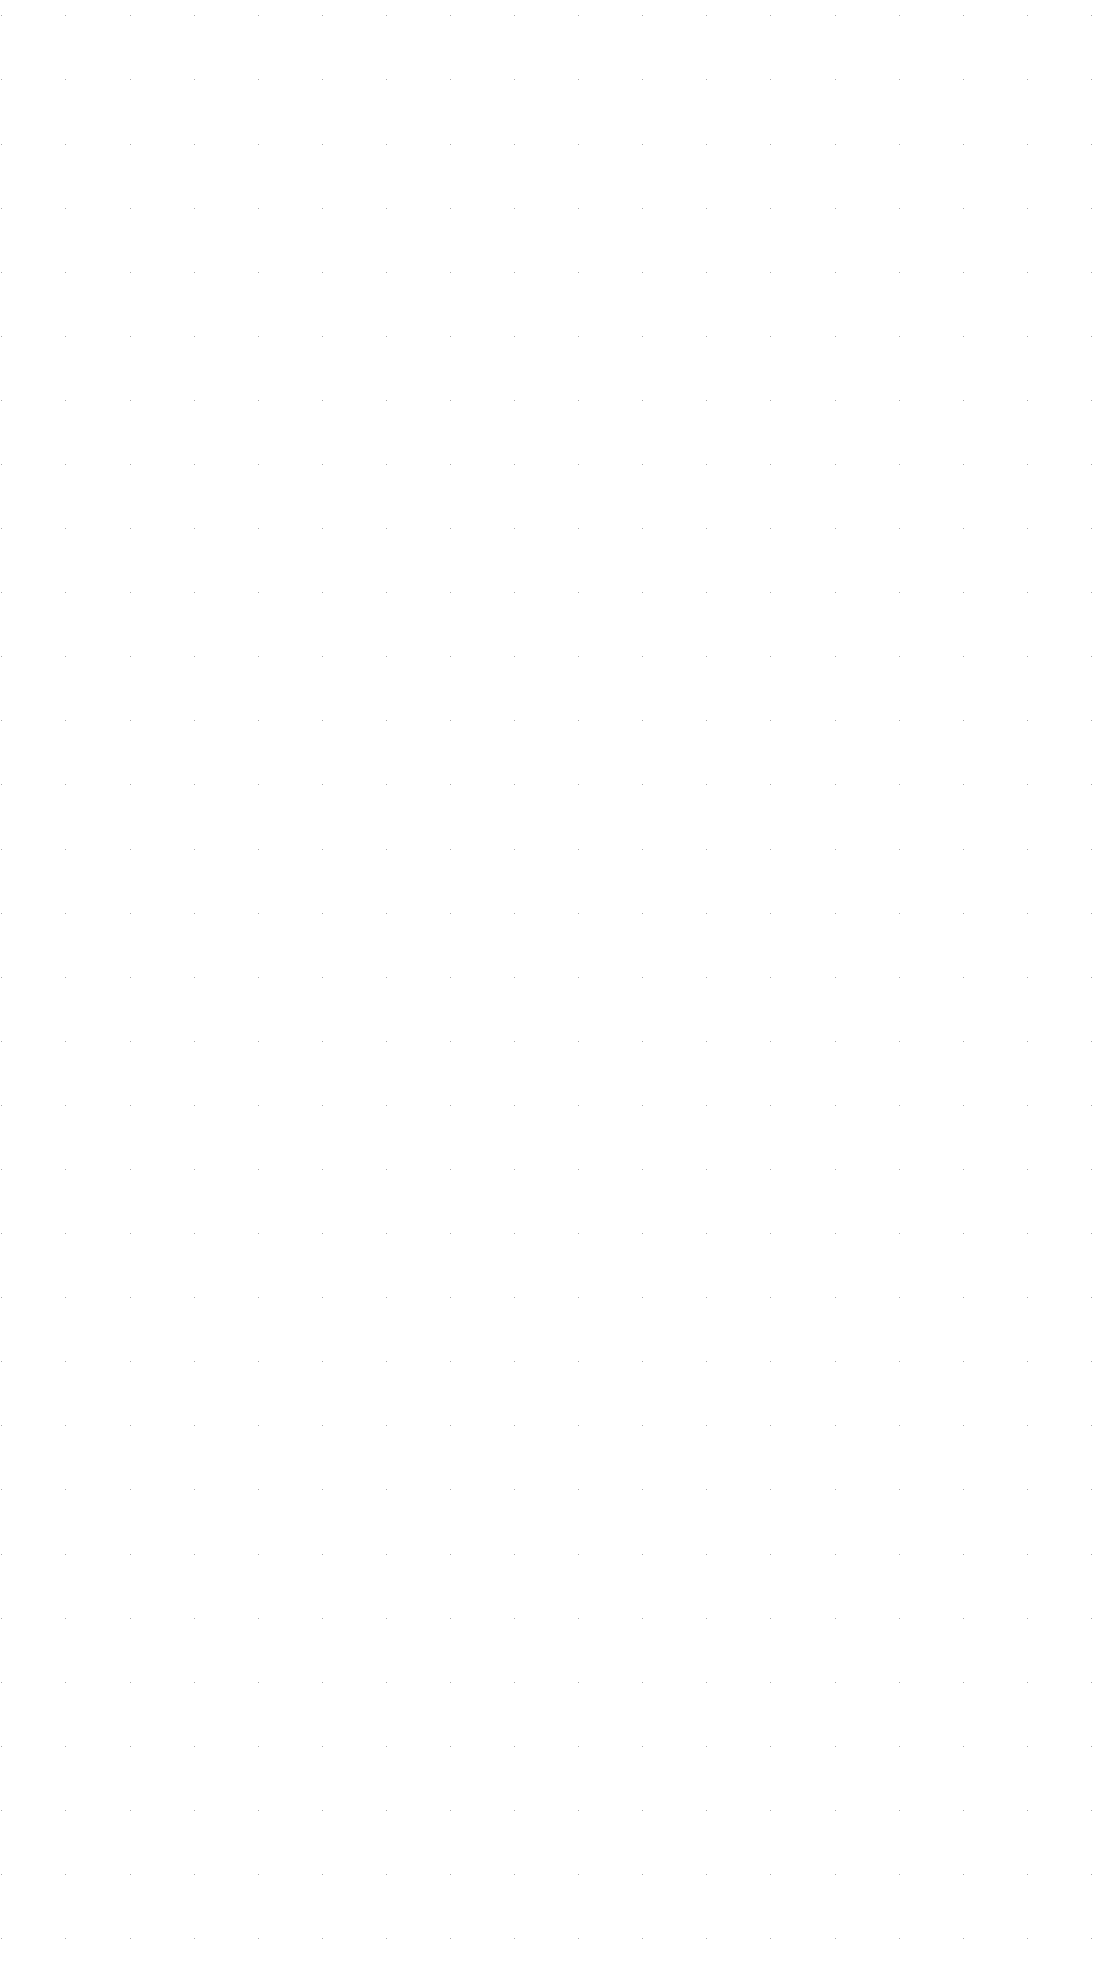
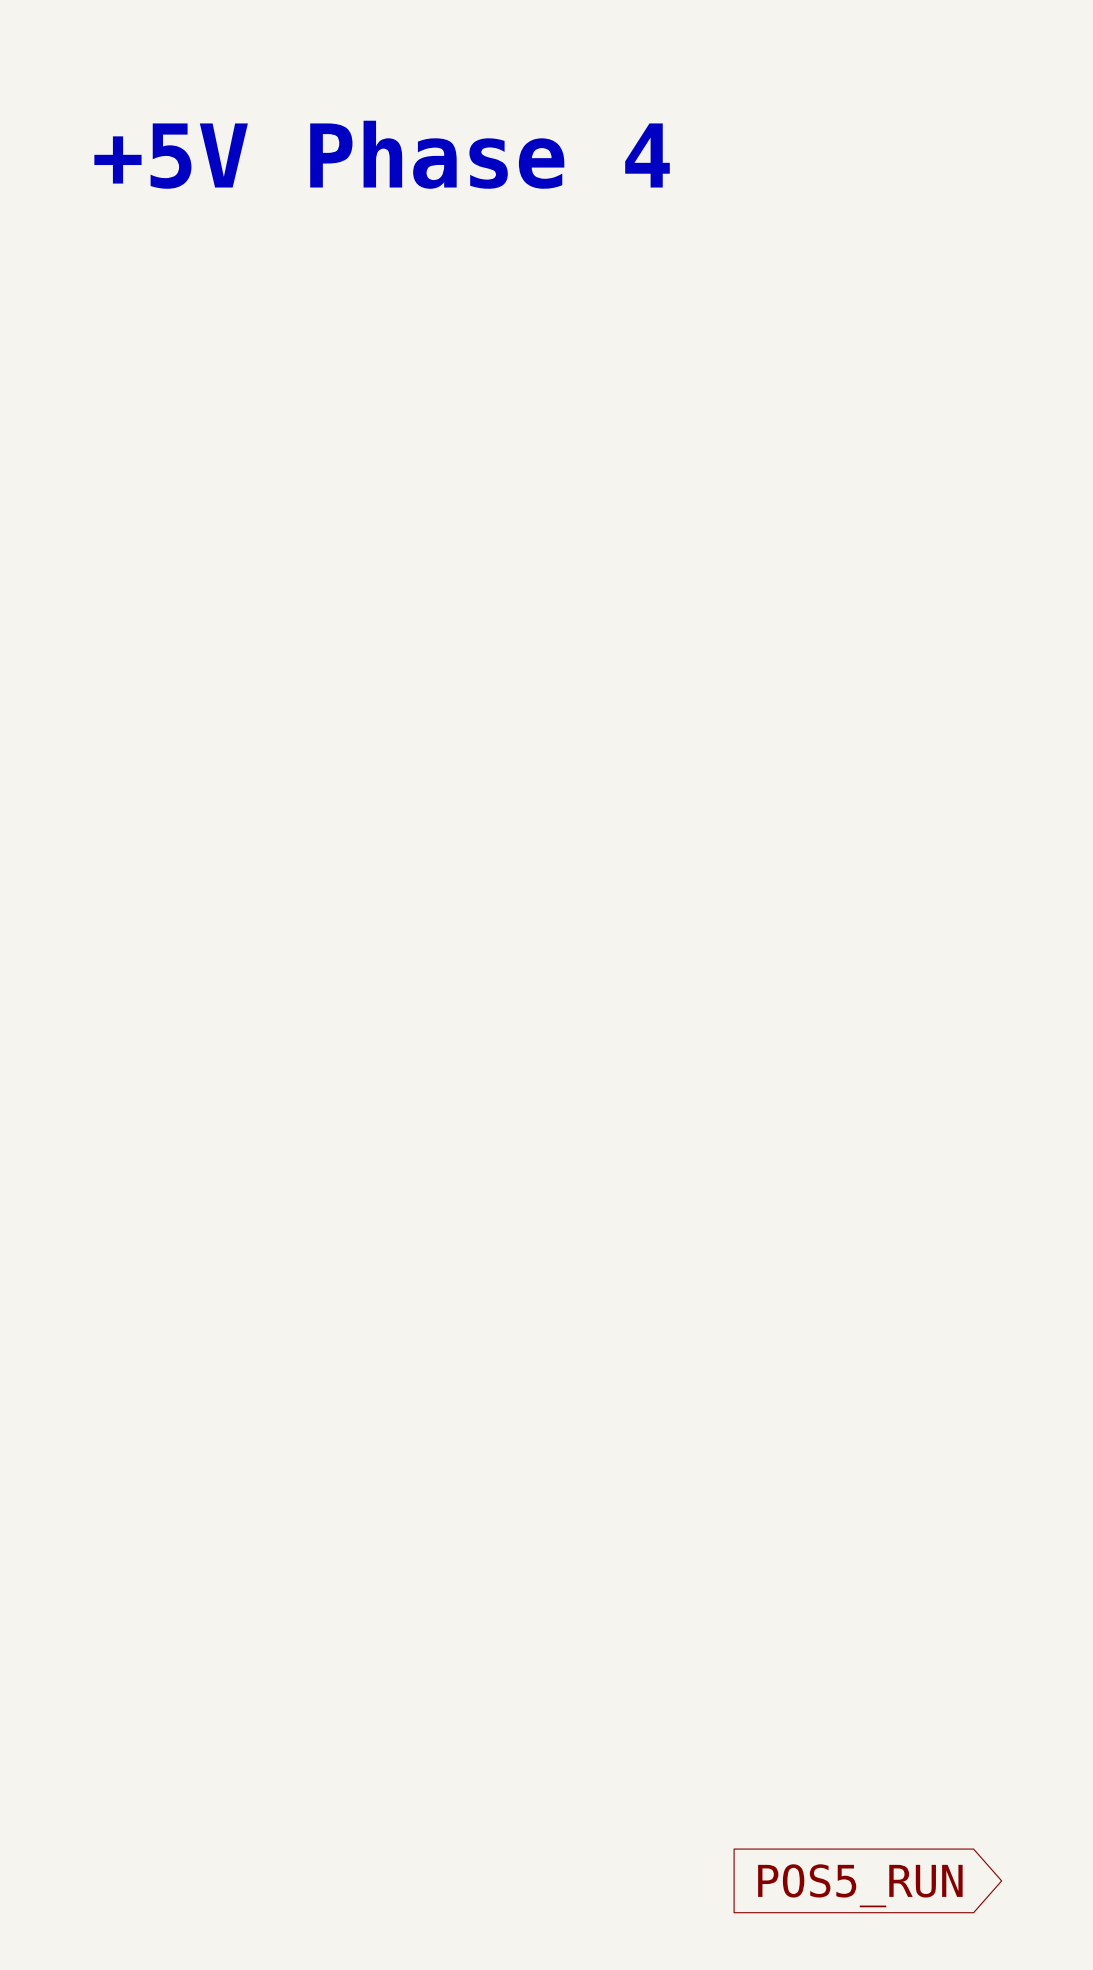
text: none -> +5V Phase 4 (382, 154)
global label: none -> POS5_RUN (860, 1885)

